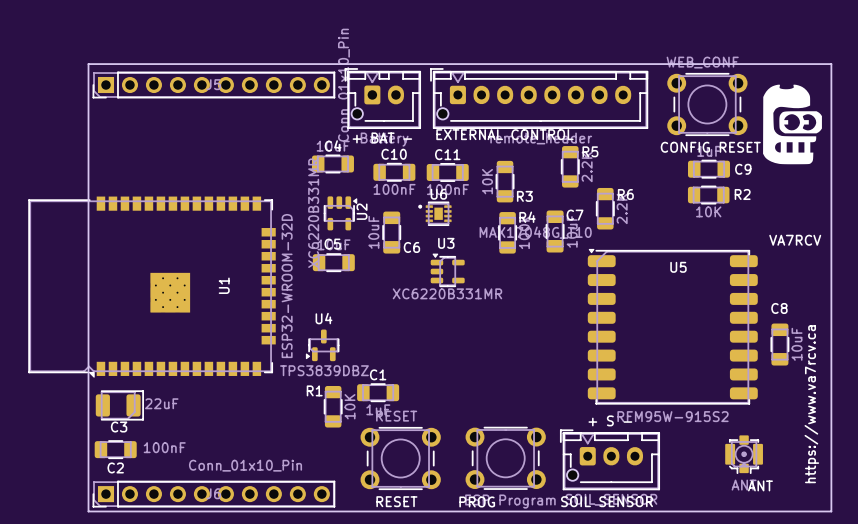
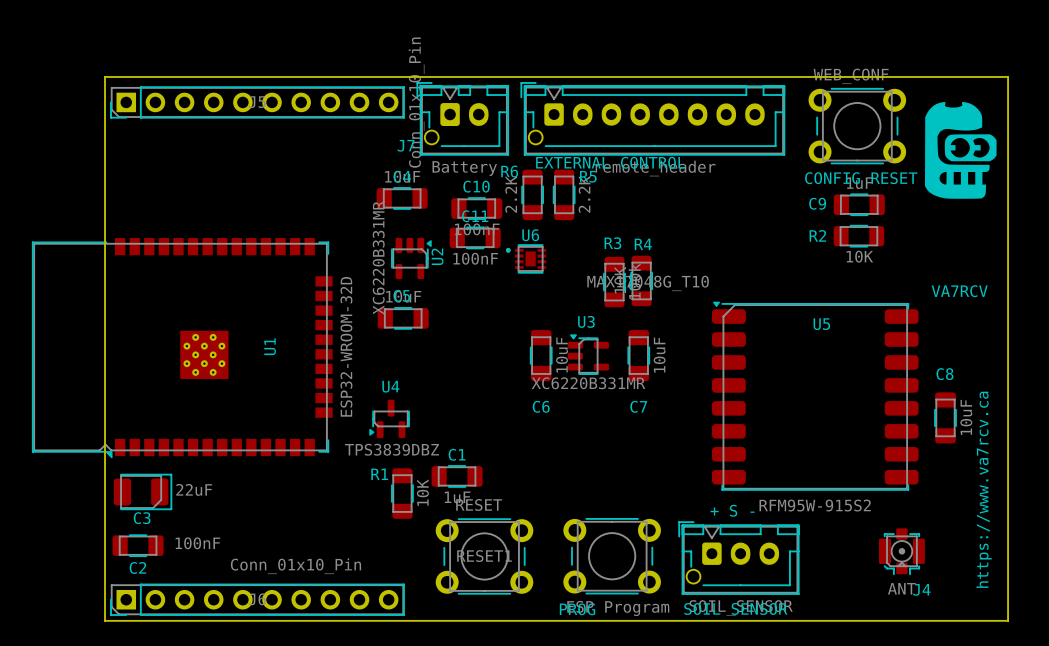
+ BAT - name: + BAT - (382, 137) -> J7 (406, 145)
R5 position: (570, 166) -> (564, 194)
C9 name position: C9 (743, 169) -> C9 (817, 203)
C11 position: (447, 172) -> (475, 237)
R3 position: (505, 181) -> (641, 280)
R6 name position: R6 (625, 194) -> R6 (509, 171)
R2 name position: R2 (742, 194) -> R2 (817, 235)
R3 name position: R3 (524, 196) -> R3 (612, 243)
R6 position: (605, 208) -> (532, 194)
R6 value position: 2.2K (622, 208) -> 2.2K (511, 194)
C7 name position: C7 (575, 215) -> C7 (638, 406)
R4 name position: R4 (527, 217) -> R4 (643, 244)
C7 position: (555, 231) -> (638, 355)
C6 value position: 10uF (373, 232) -> 10uF (562, 355)
C6 position: (391, 232) -> (541, 355)
C6 name position: C6 (411, 247) -> C6 (541, 406)
U3 position: (447, 270) -> (588, 354)
ANT name: ANT (760, 485) -> J4 (921, 589)
RESET name: RESET (396, 501) -> RESET1 (484, 556)

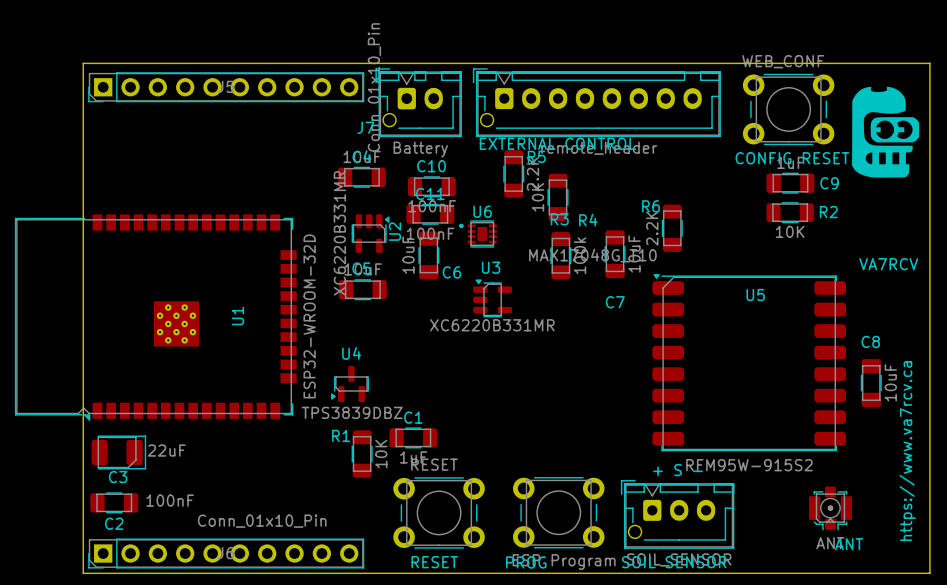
R6 position: (532, 194) -> (672, 228)
C9 name position: C9 (817, 203) -> C9 (829, 183)
R2 name position: R2 (817, 235) -> R2 (828, 212)
R3 position: (641, 280) -> (558, 197)
U3 position: (588, 354) -> (492, 298)
C6 position: (541, 355) -> (428, 255)
C6 value position: 10uF (562, 355) -> 10uF (408, 255)
C7 position: (638, 355) -> (615, 254)
C6 name position: C6 (541, 406) -> C6 (451, 272)
RESET1 name: RESET1 (484, 556) -> RESET (434, 562)
J4 name: J4 (921, 589) -> ANT (849, 544)

